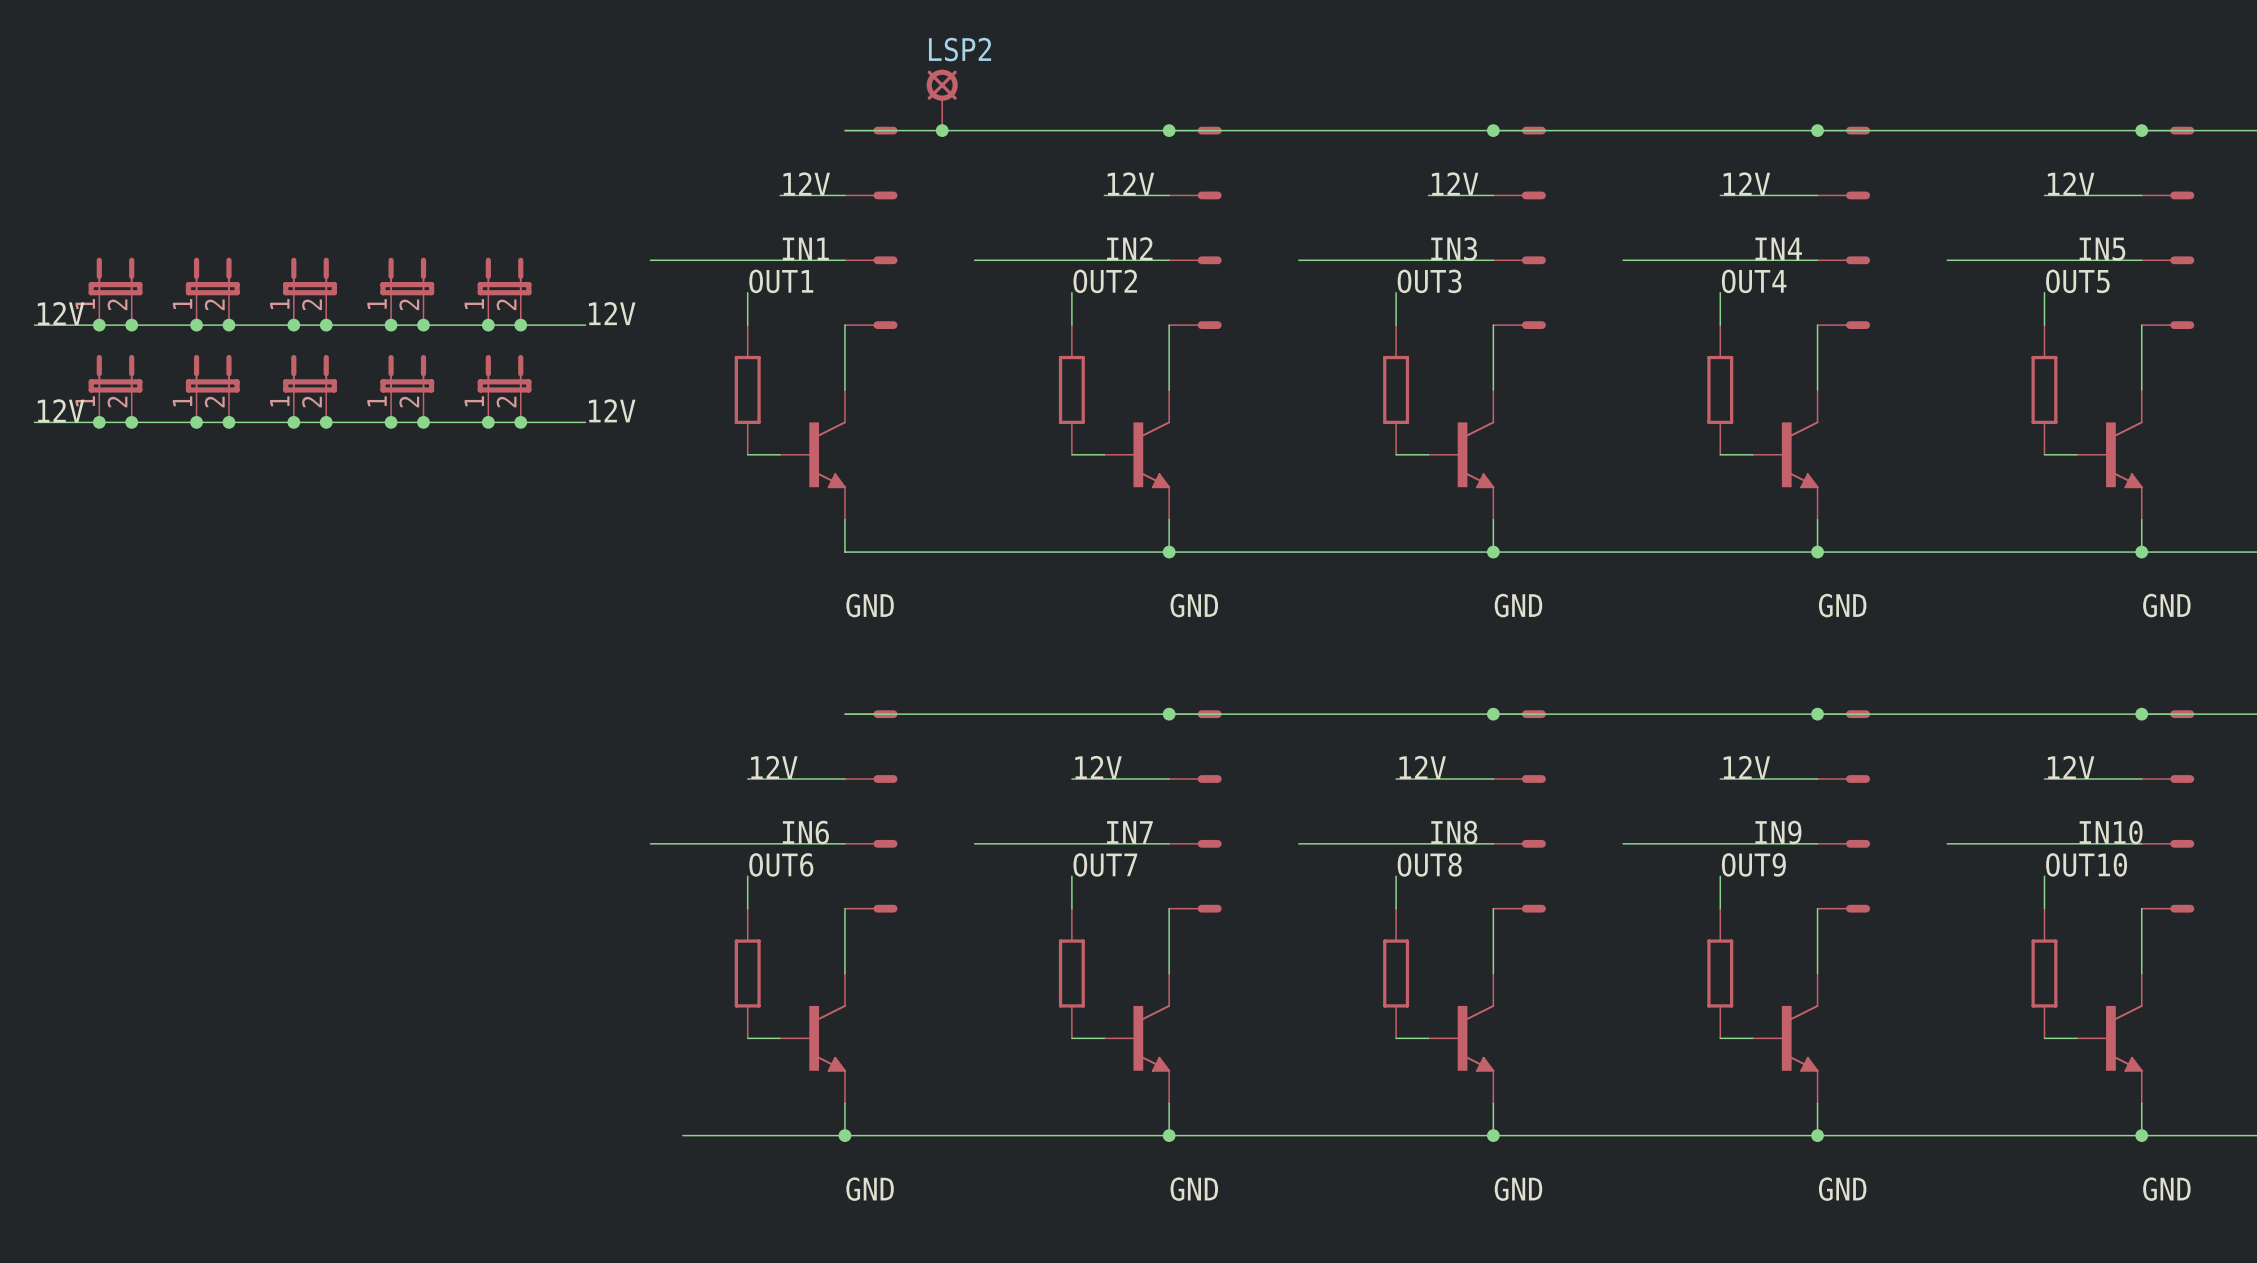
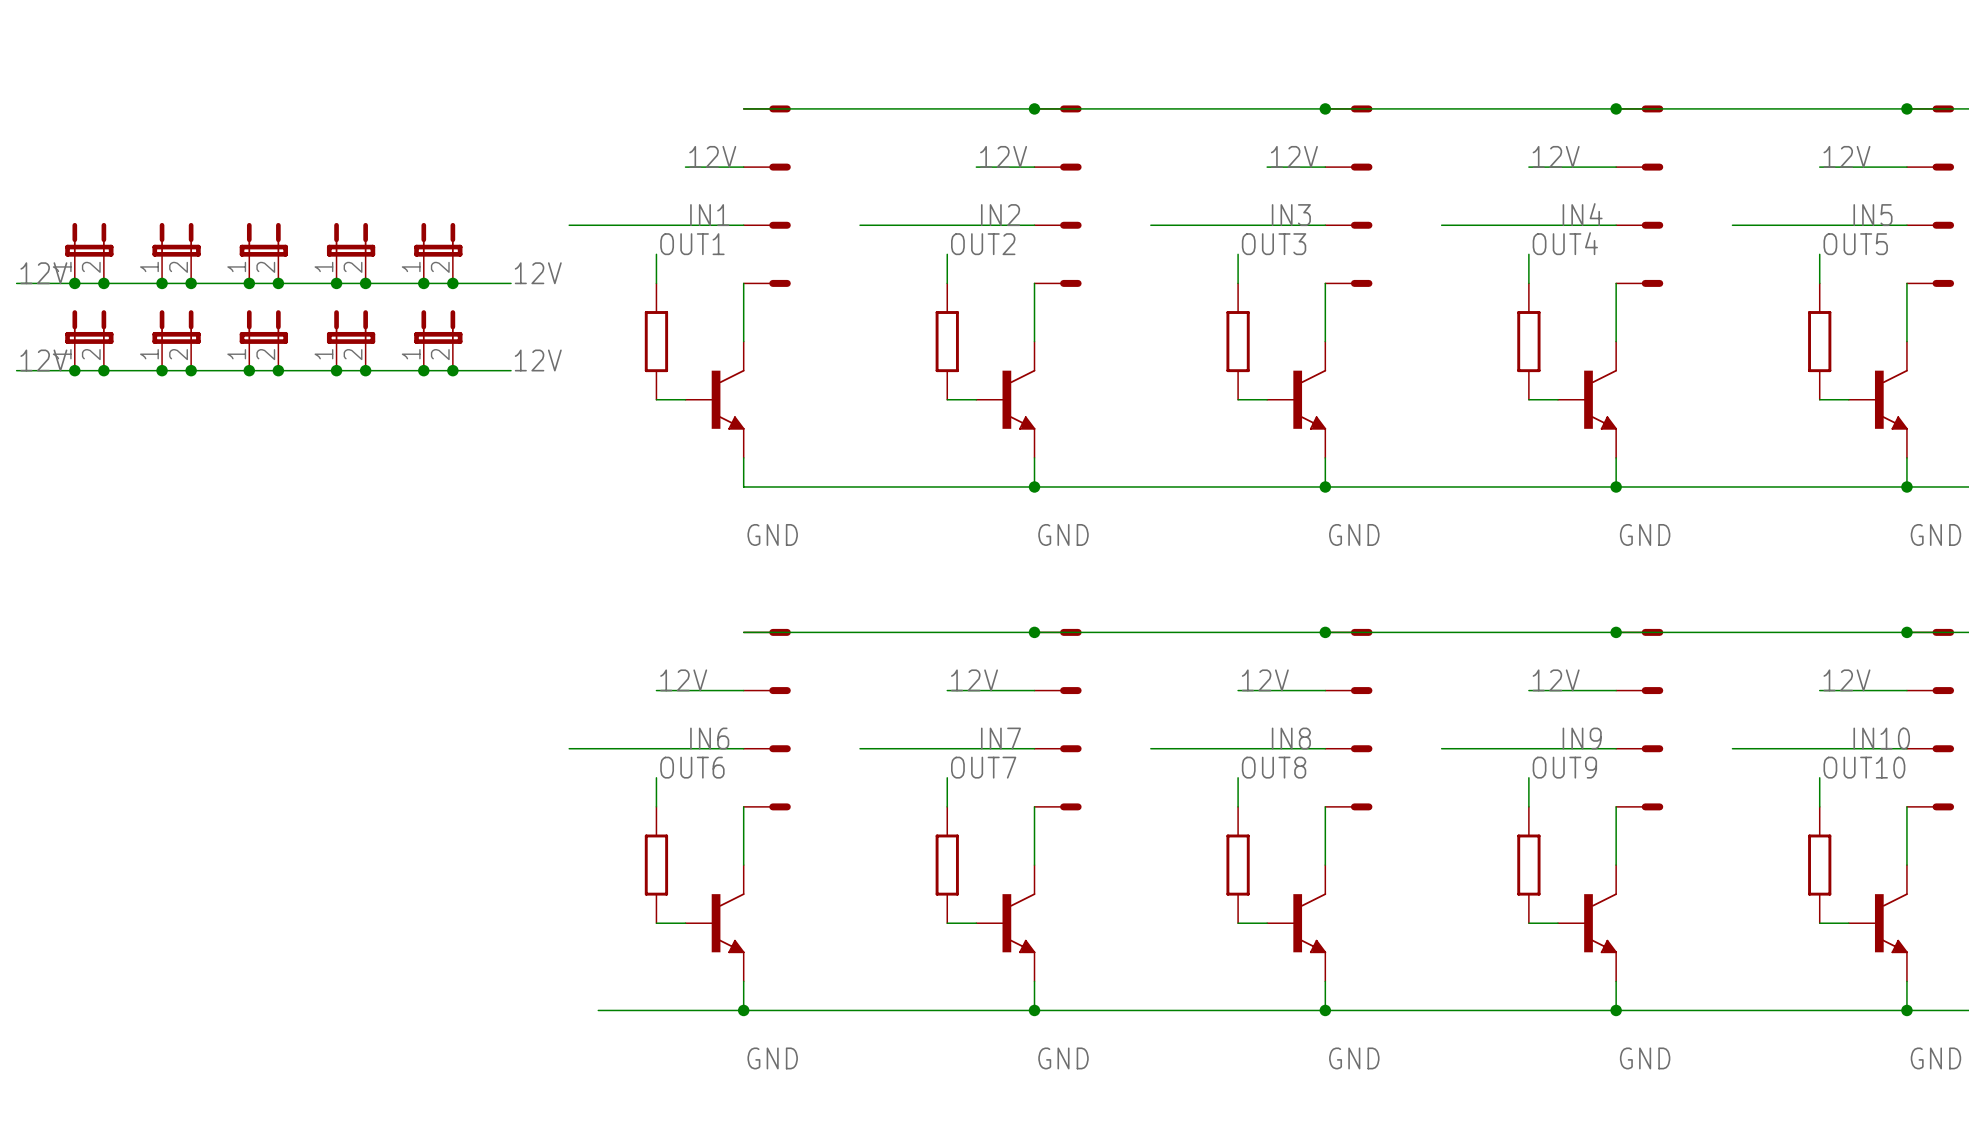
LSP2: (942, 100) -> none
junction: (942, 130) -> none

